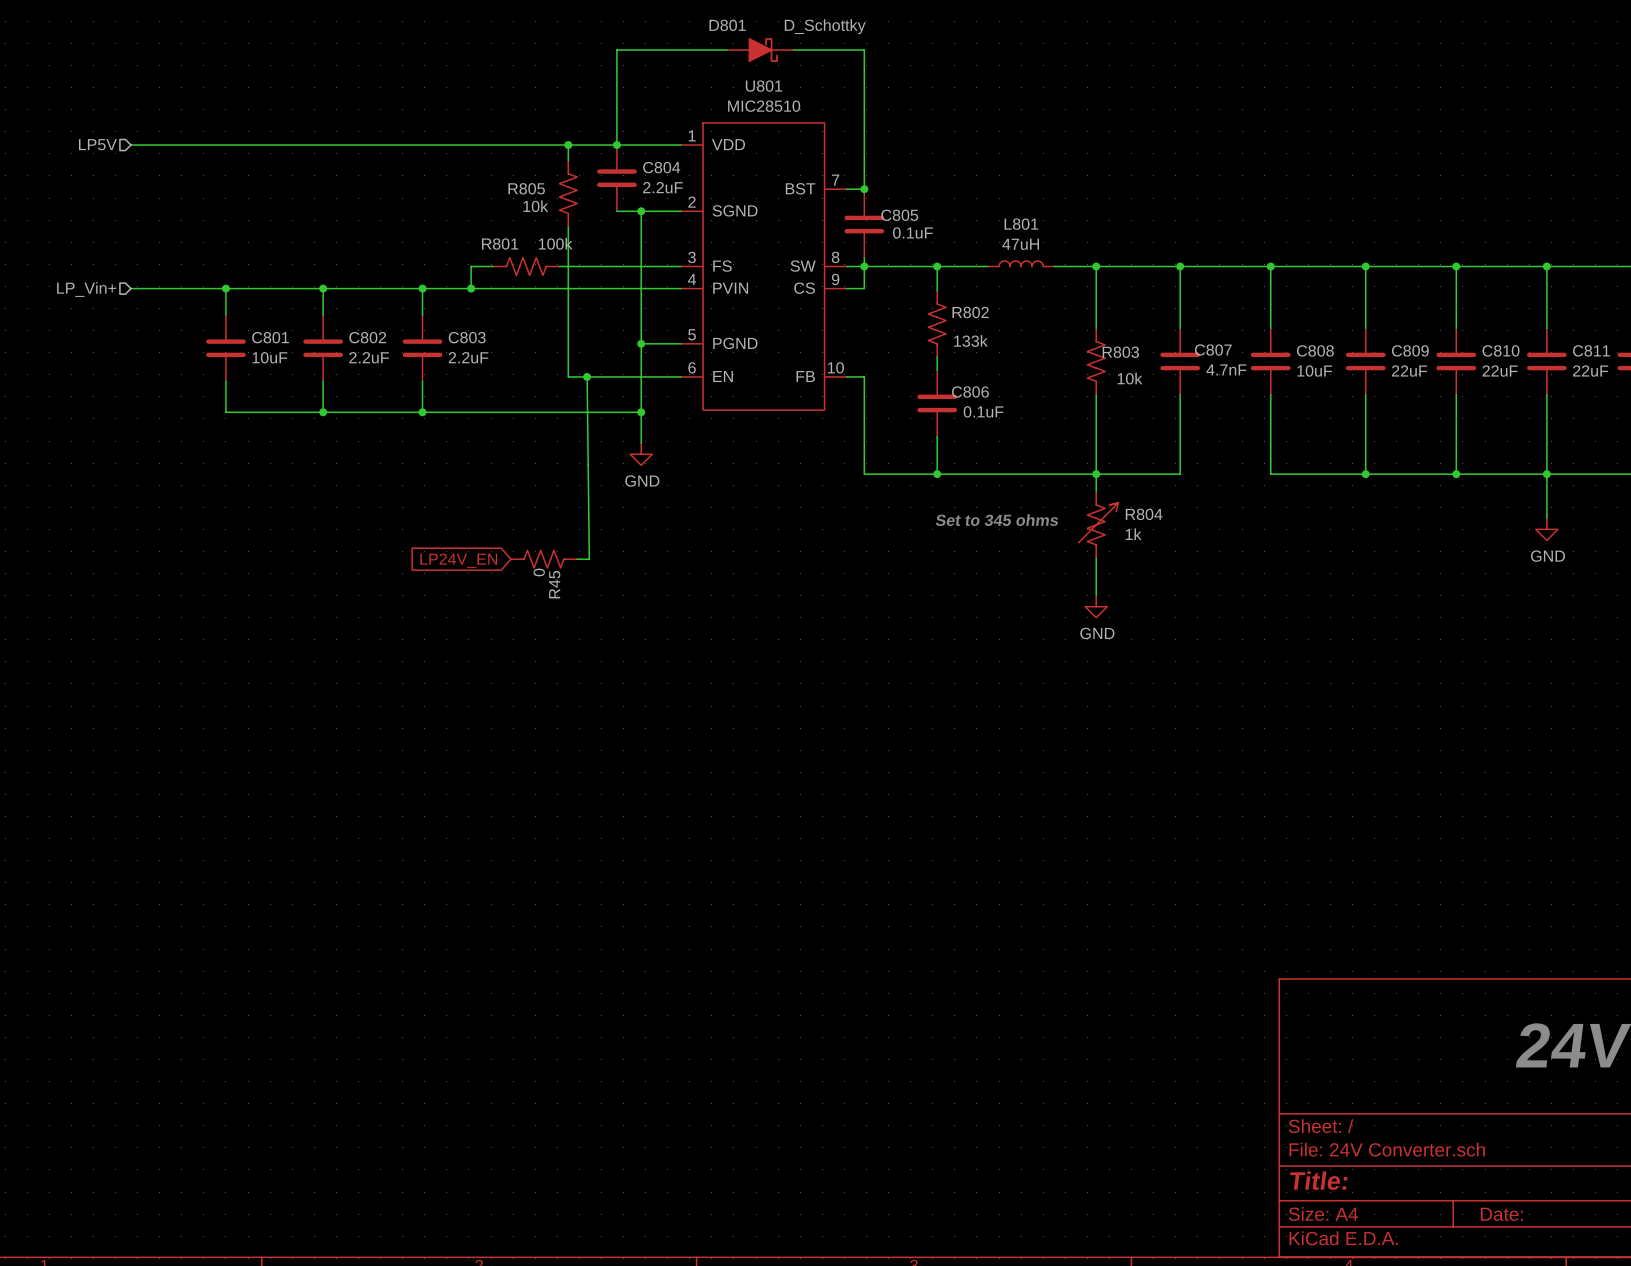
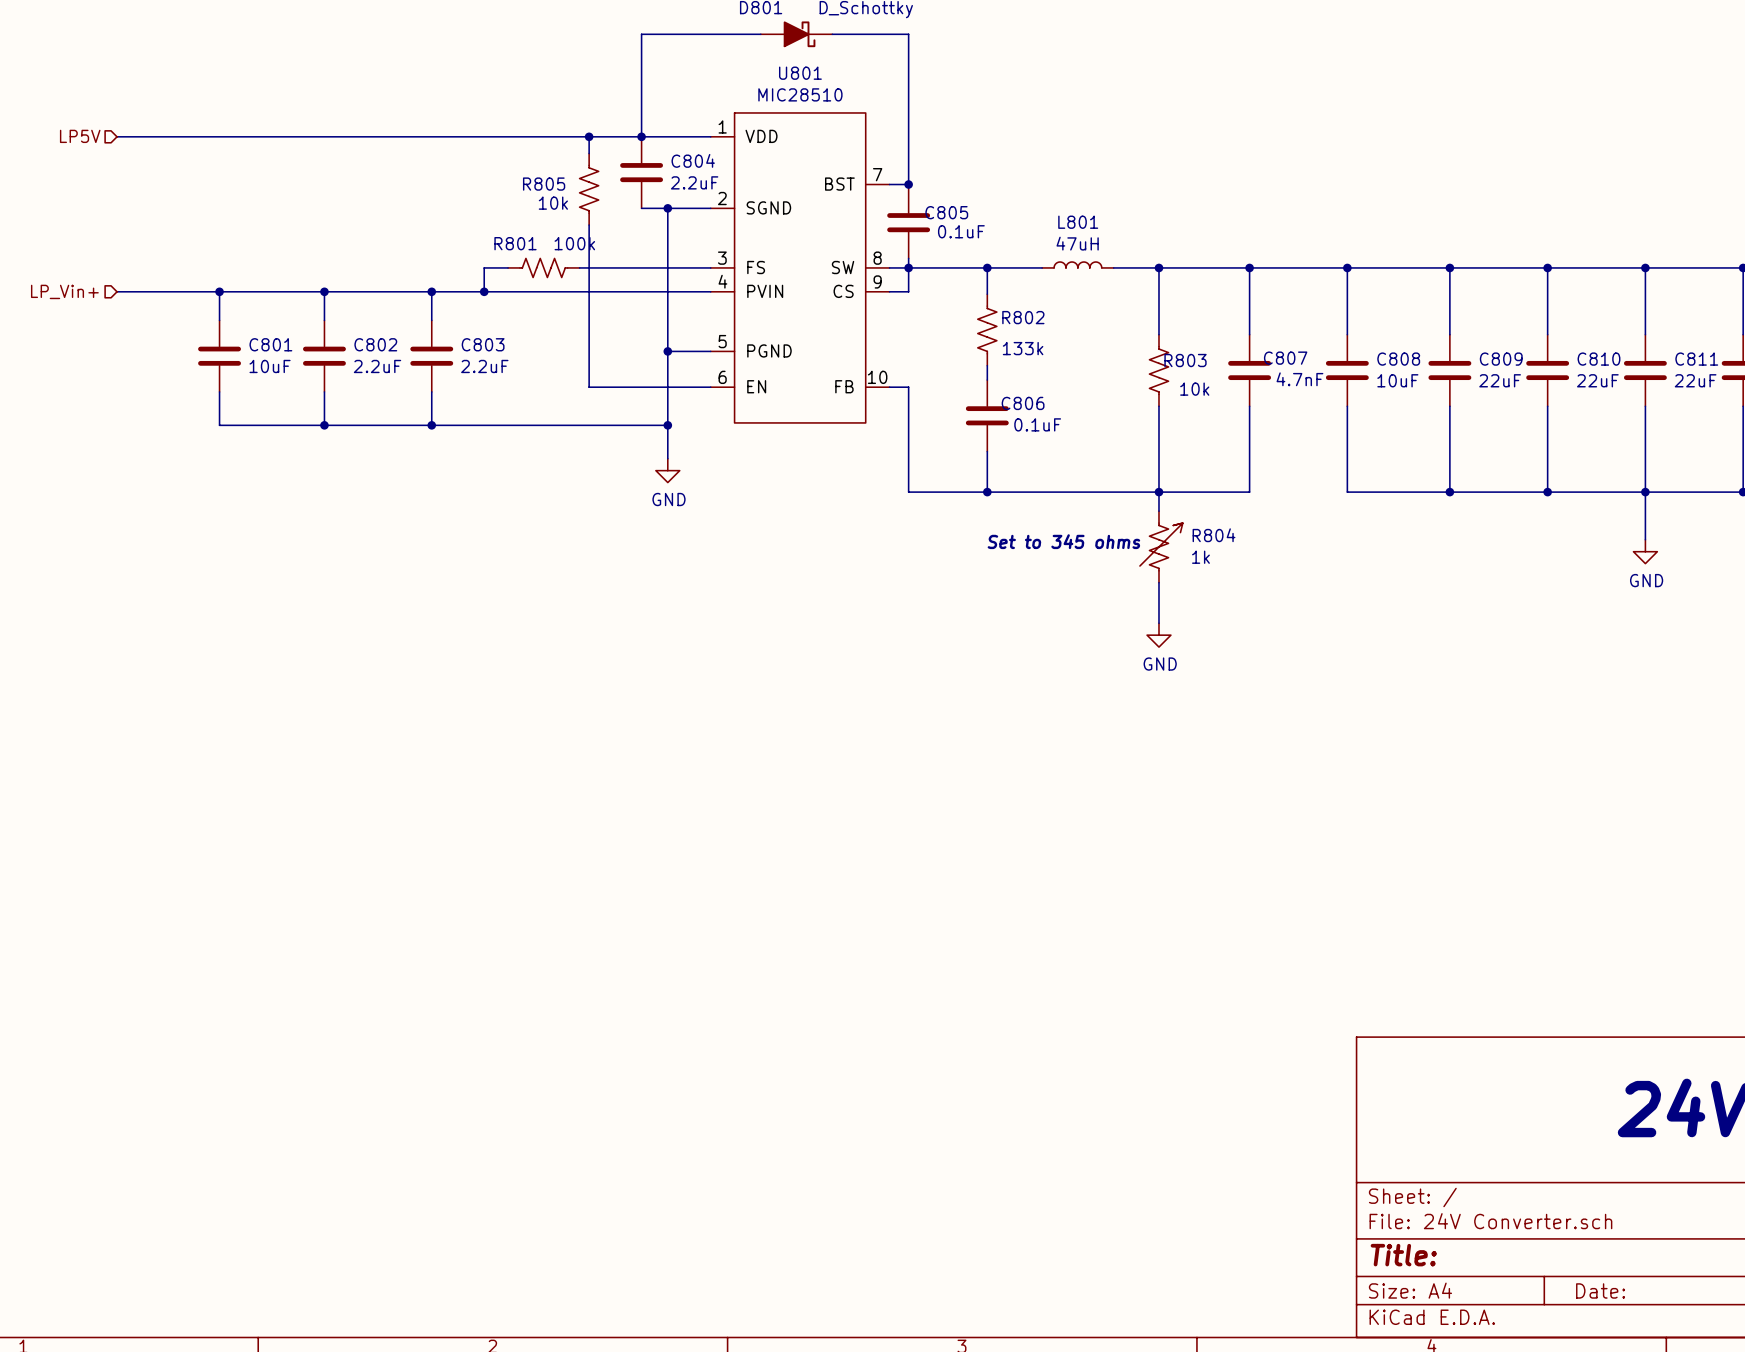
wire: (587, 376) (589, 559) (577, 559) -> none
junction: (587, 376) -> none
R45: 0 (544, 559) -> none
global label: LP24V_EN (458, 560) -> none

